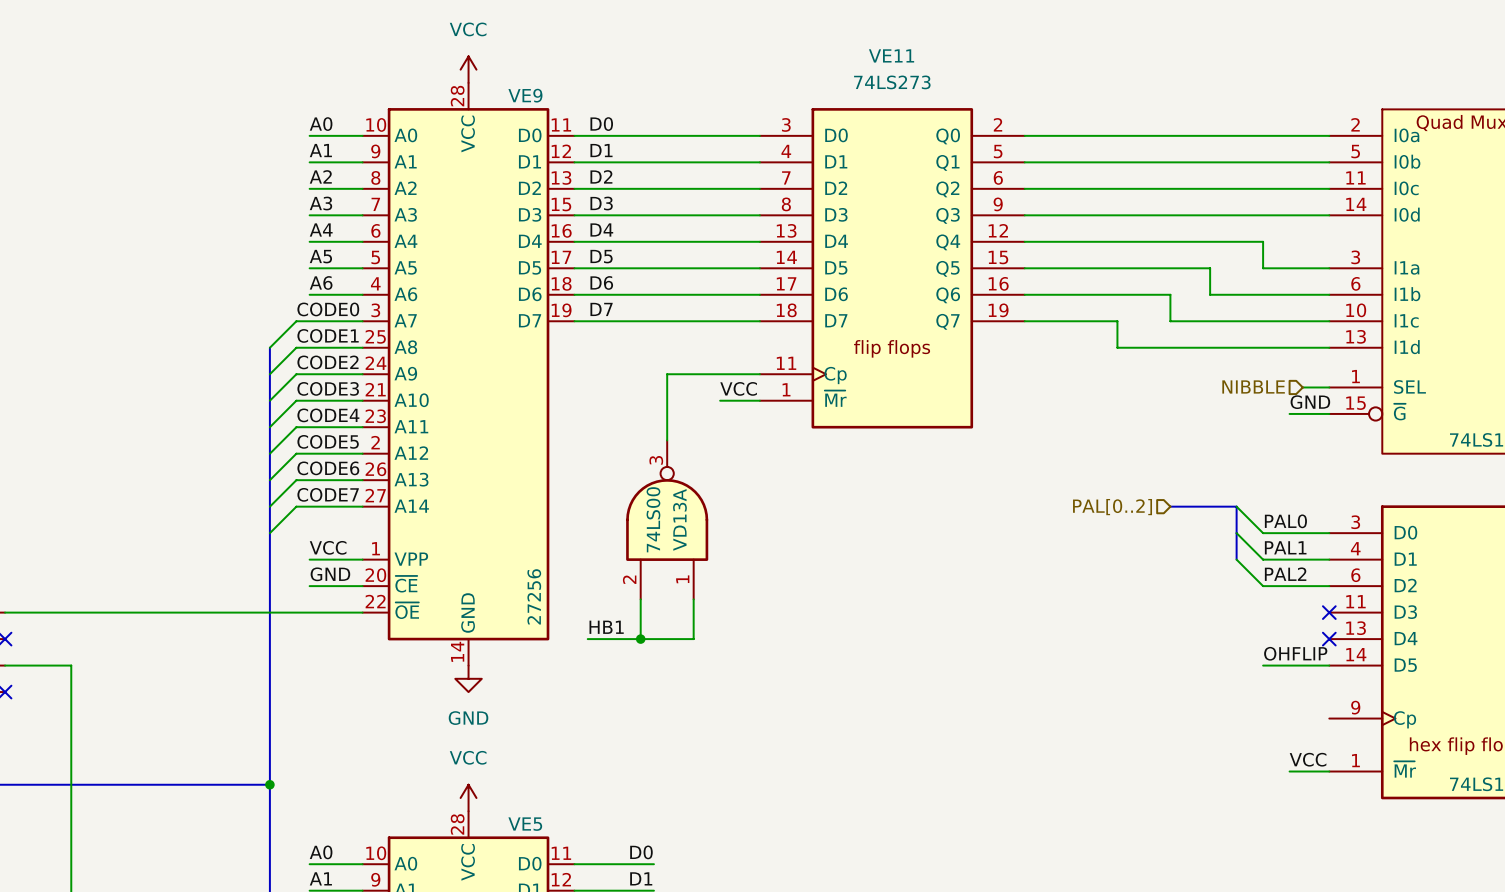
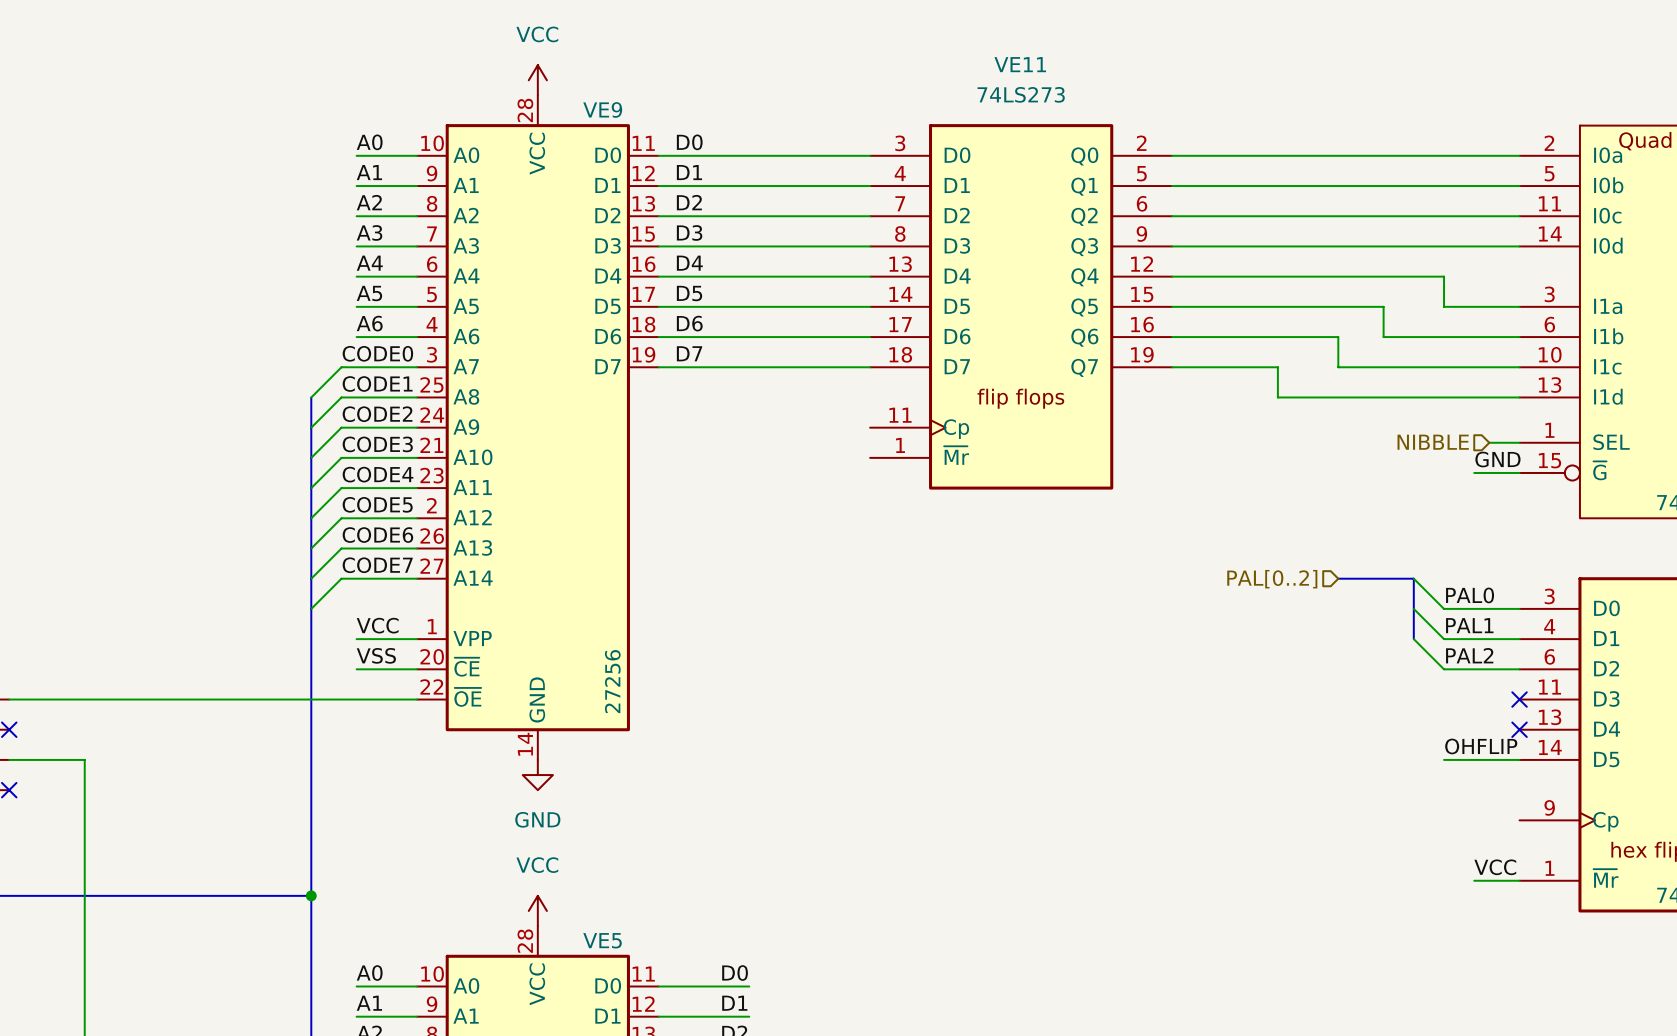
wire: (759, 374) (667, 374) (667, 440) -> none
label: VCC (738, 388) -> none
wire: (720, 400) (759, 400) -> none
VD13A: 74LS00 (667, 519) -> none
label: GND (330, 574) -> VSS (376, 655)
wire: (640, 599) (640, 639) -> none
wire: (693, 599) (693, 639) (587, 639) -> none
label: HB1 (606, 627) -> none
junction: (640, 639) -> none

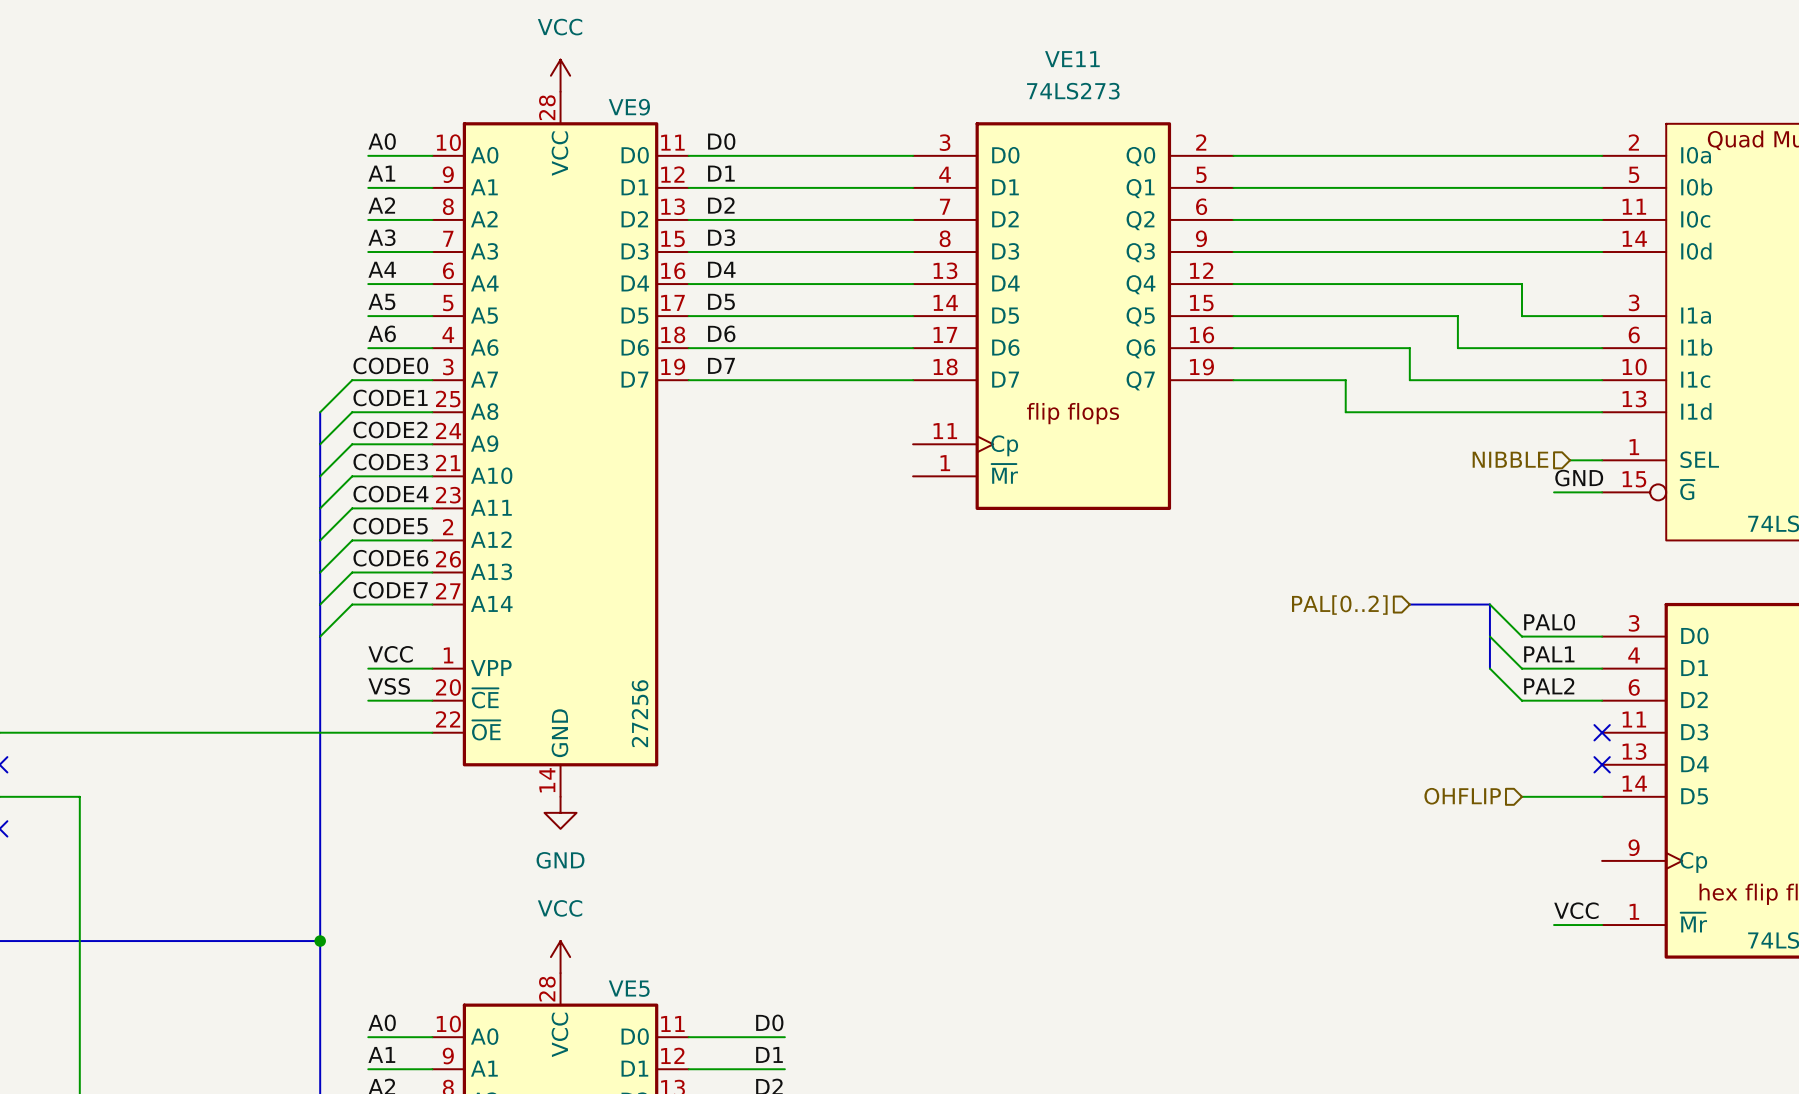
label: OHFLIP (1481, 746) -> none
hierarchical label: none -> OHFLIP (1462, 796)

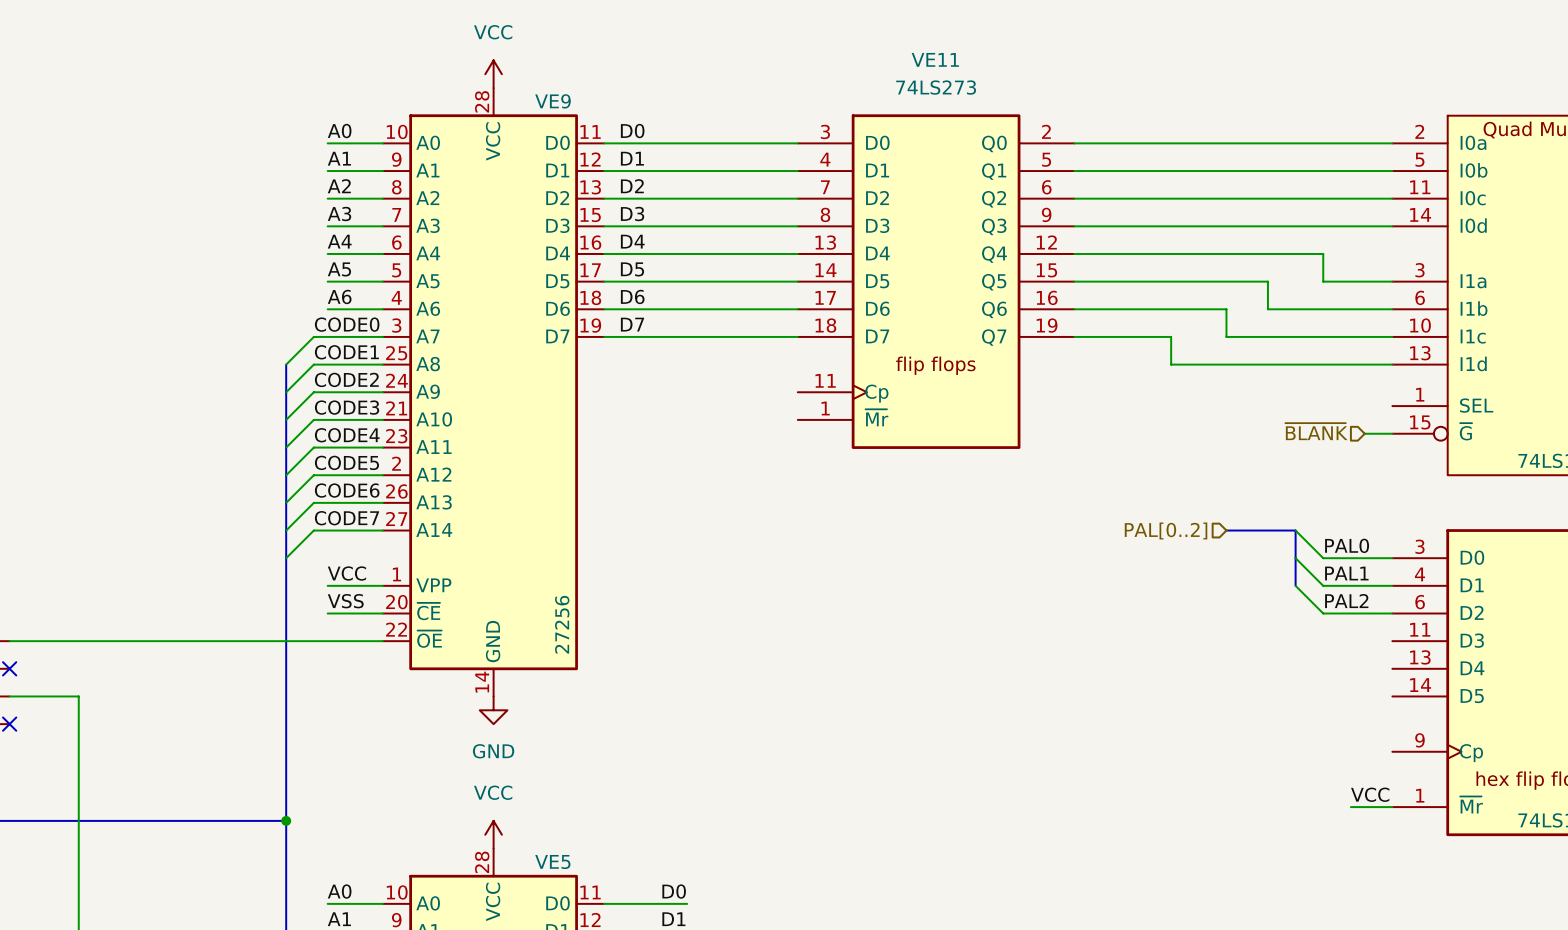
hierarchical label: NIBBLE (1510, 459) -> none
wire: (1570, 460) (1602, 460) -> none
label: GND (1579, 478) -> none
hierarchical label: none -> ~{BLANK} (1316, 431)
wire: (1554, 492) (1570, 492) -> none
no-connect mark: (1602, 732) -> none
no-connect mark: (1602, 764) -> none
hierarchical label: OHFLIP (1462, 796) -> none
wire: (1522, 796) (1602, 796) -> none

